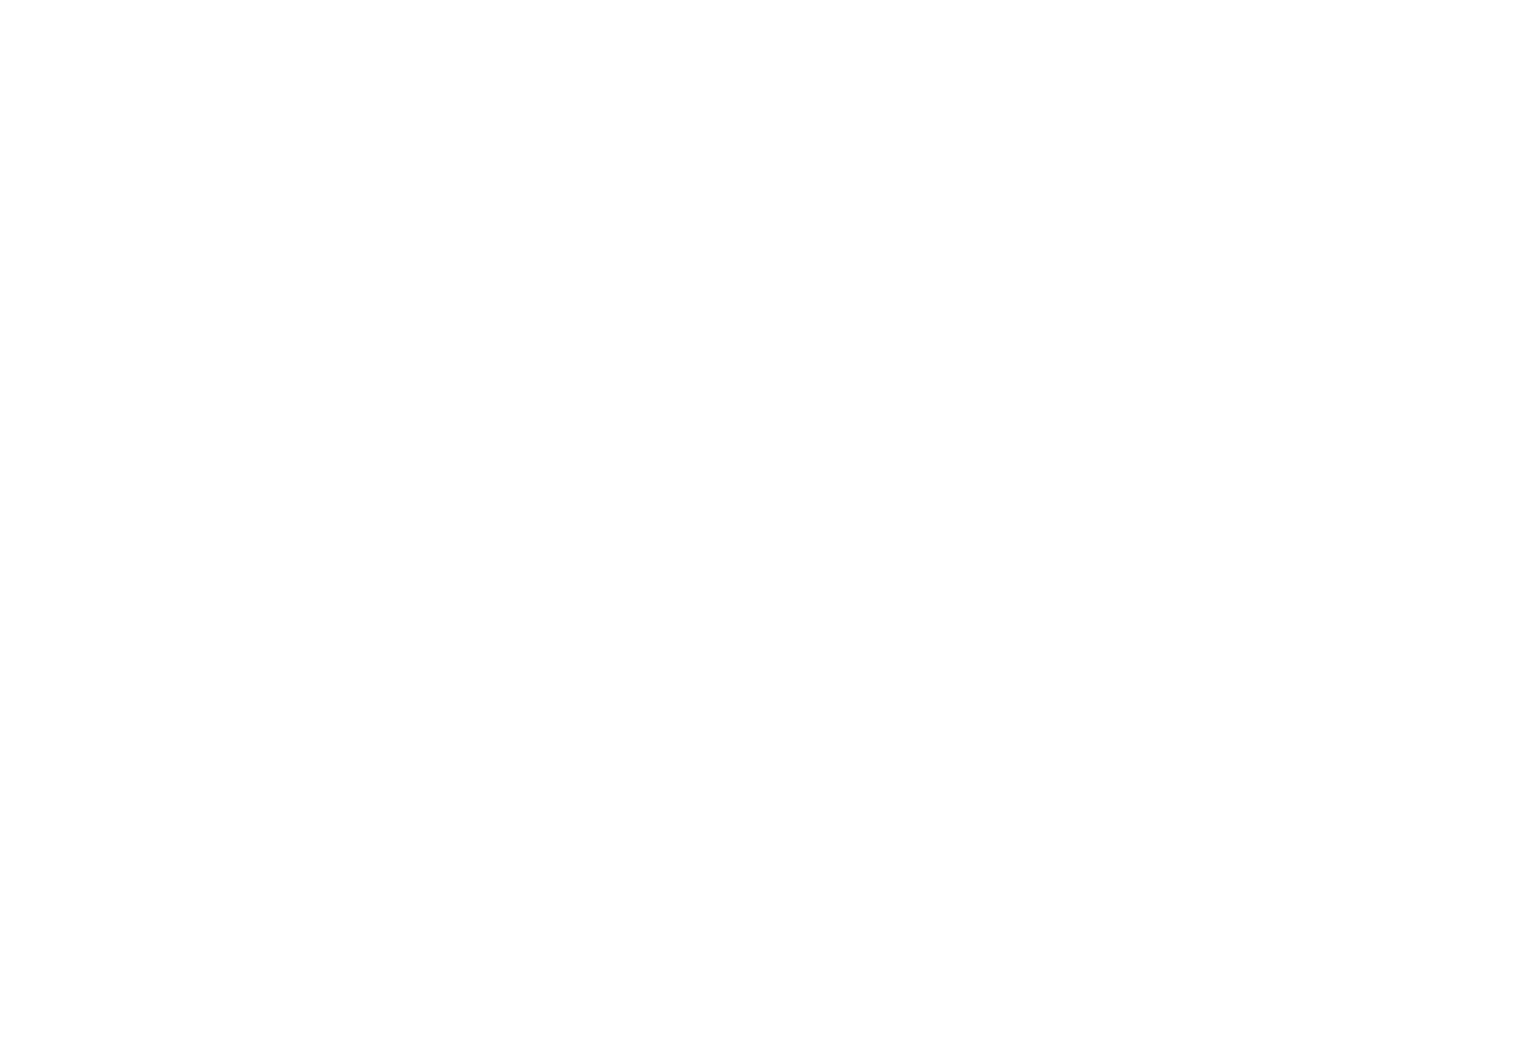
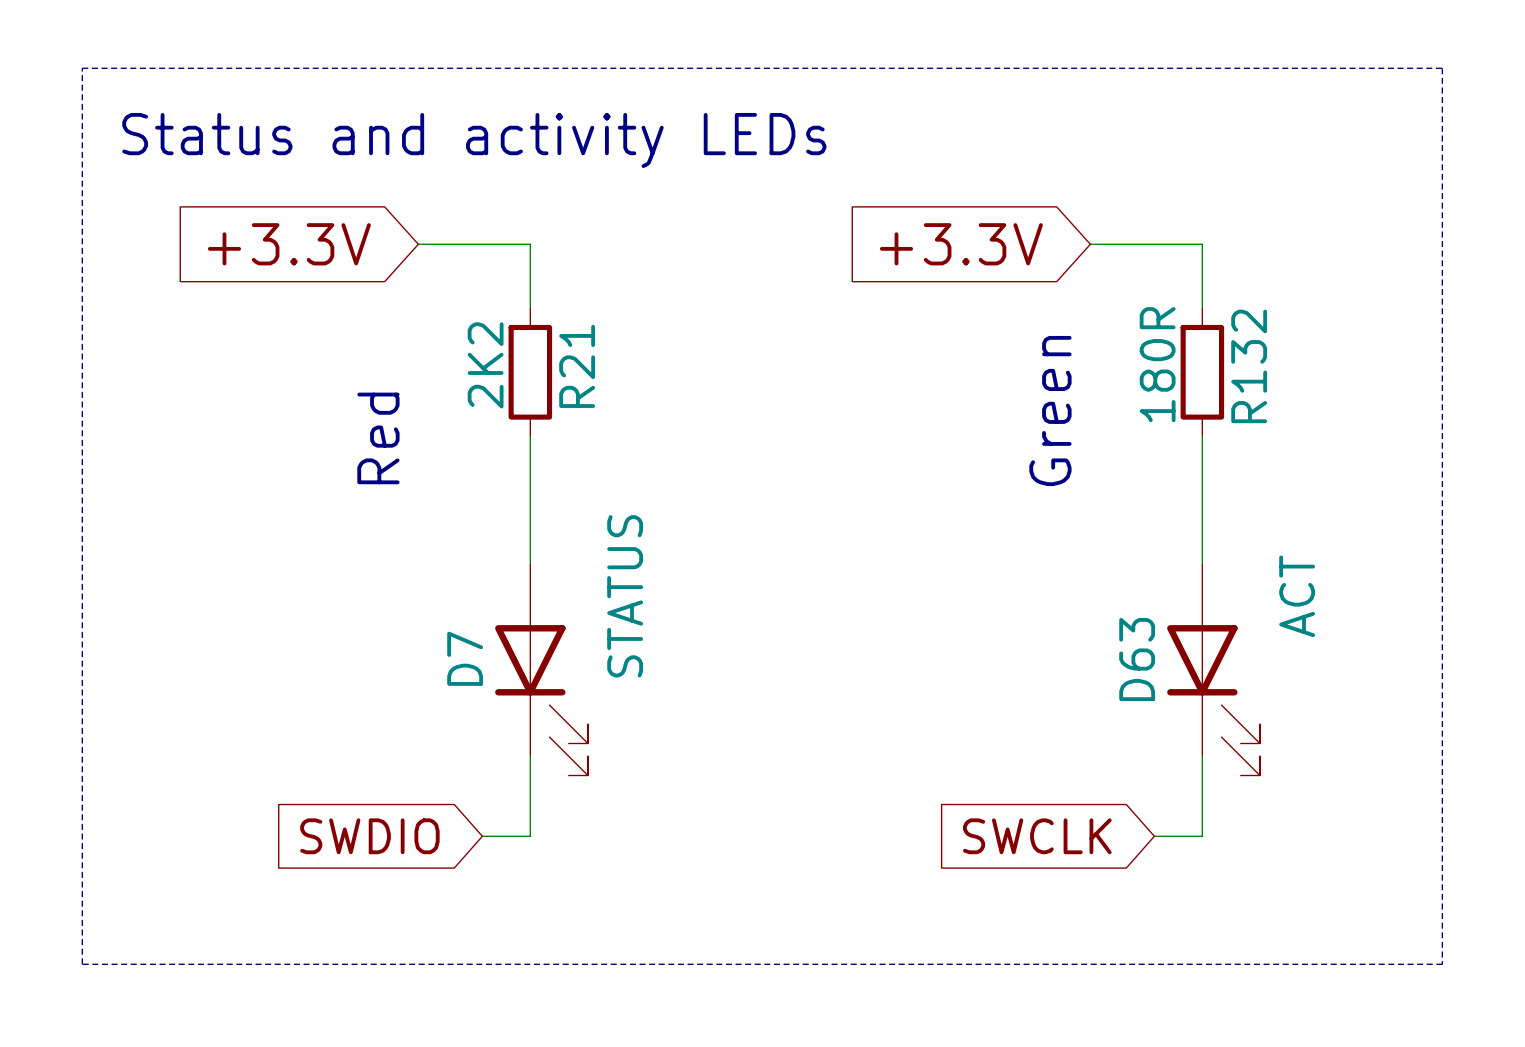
line: none -> (82, 68) (1442, 68) (1442, 964) (82, 964) (82, 68)
text: none -> Status and activity LEDs (474, 140)
global label: none -> +3.3V (289, 244)
wire: none -> (418, 244) (530, 244) (530, 308)
global label: none -> +3.3V (961, 244)
wire: none -> (1090, 244) (1202, 244) (1202, 308)
R21: none -> 2K2 (530, 372)
R132: none -> 180R (1202, 372)
text: none -> Green (1050, 411)
wire: none -> (530, 436) (530, 564)
wire: none -> (1202, 436) (1202, 564)
text: none -> Red (378, 438)
D7: none -> STATUS (541, 669)
D63: none -> ACT (1213, 669)
wire: none -> (530, 756) (530, 836) (482, 836)
wire: none -> (1202, 756) (1202, 836) (1154, 836)
global label: none -> SWDIO (369, 836)
global label: none -> SWCLK (1037, 836)

